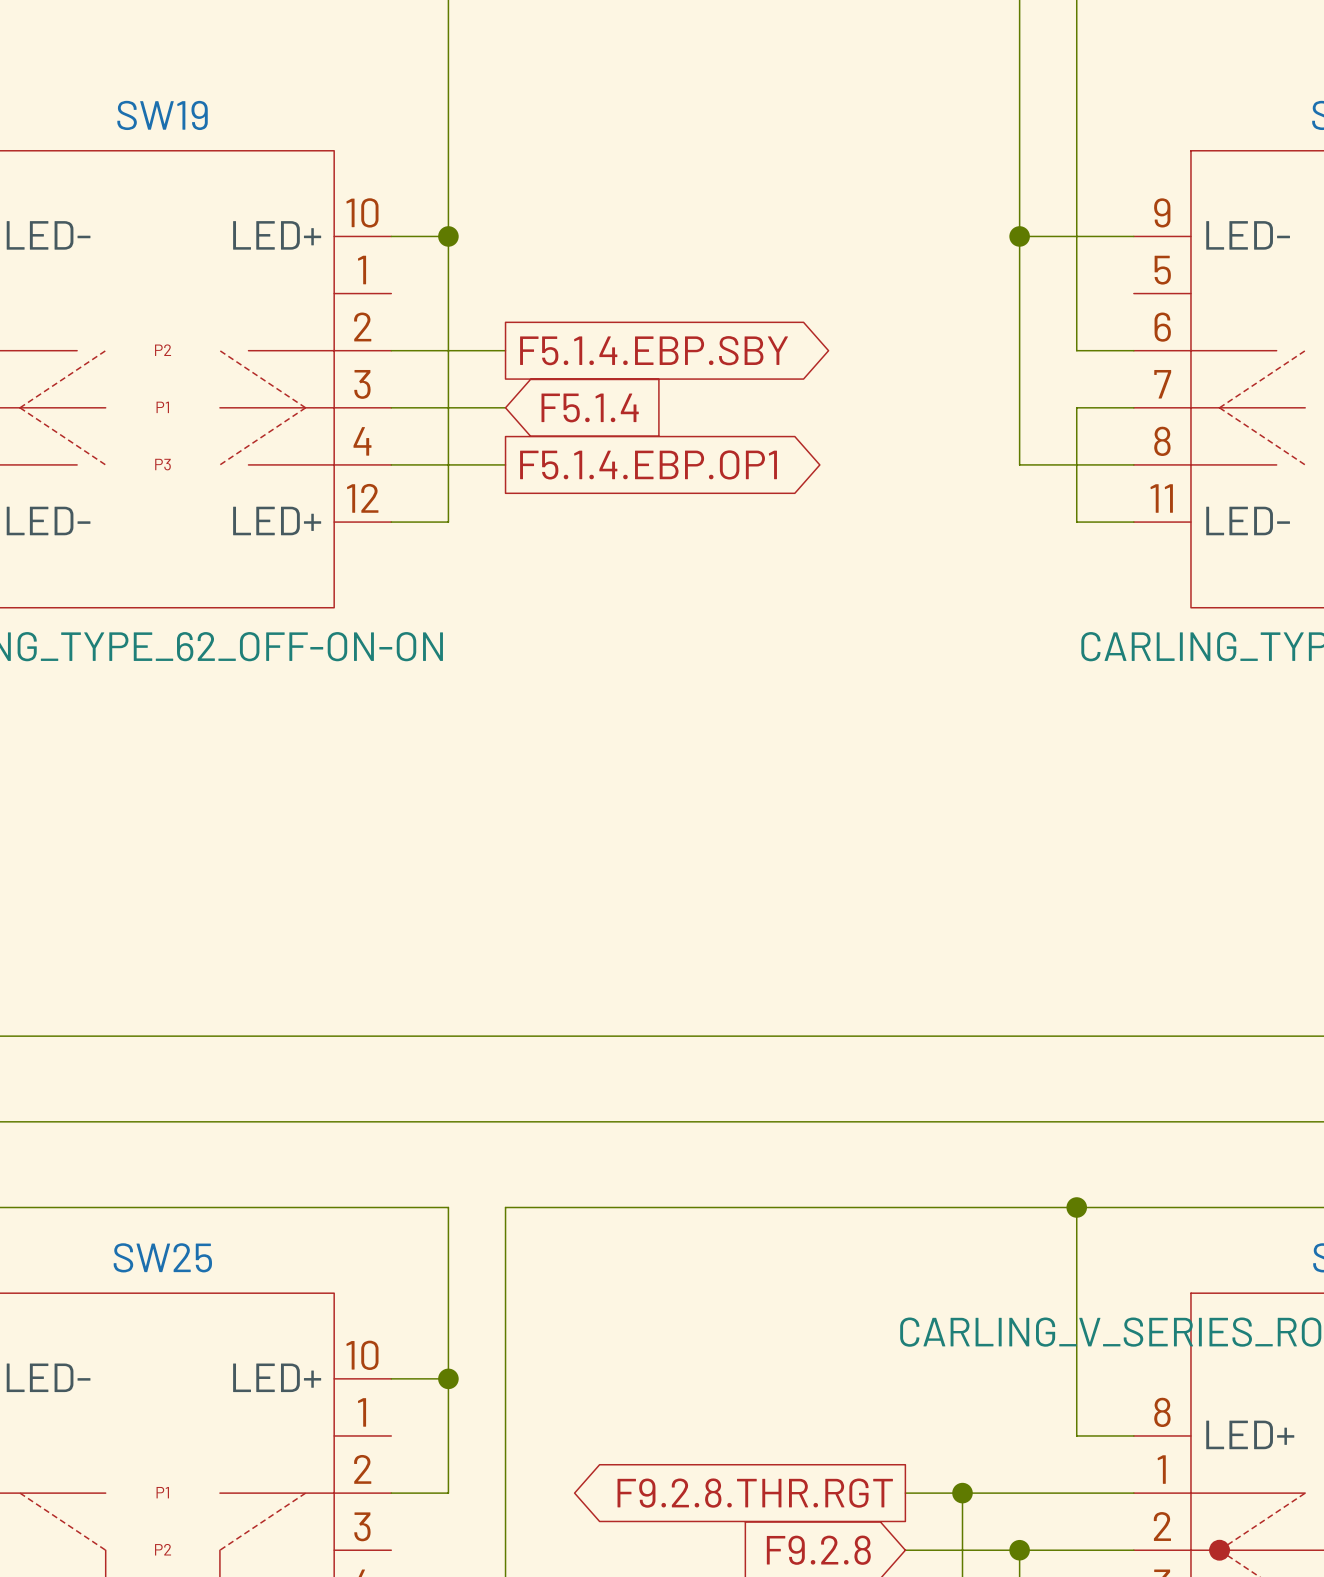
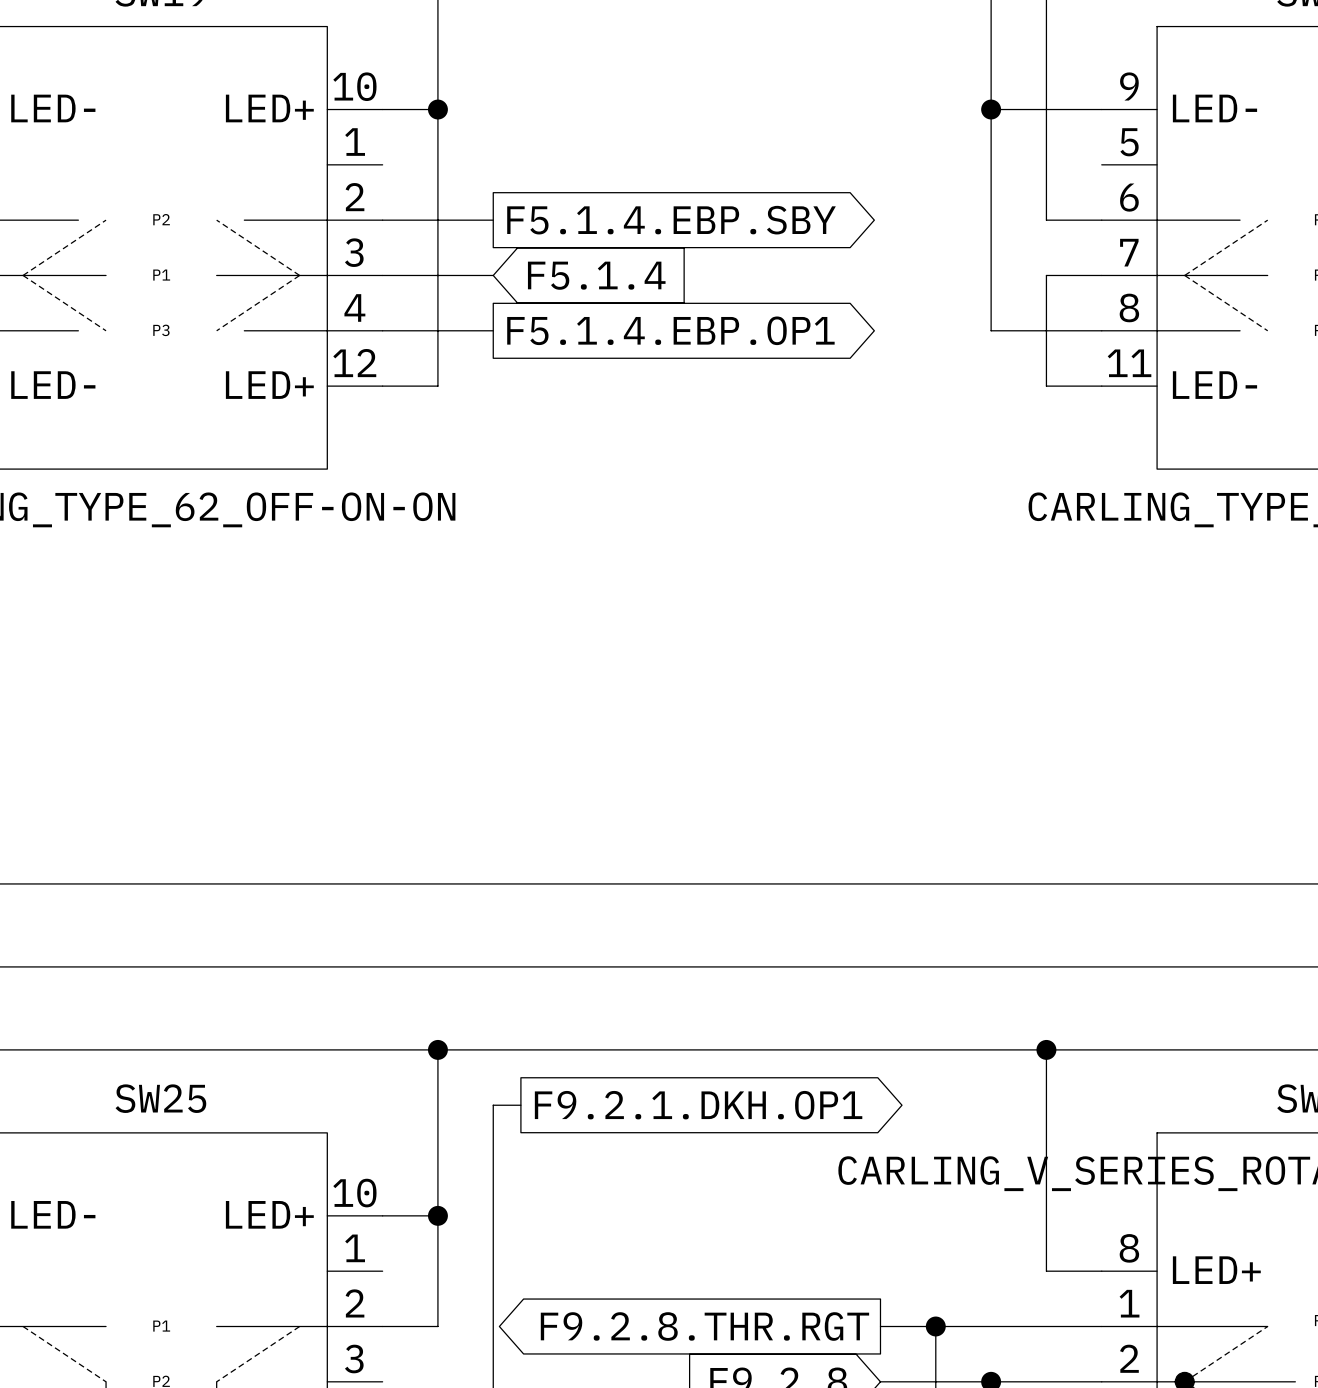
wire: none -> (437, 1049) (493, 1049)
junction: none -> (437, 1049)
wire: (505, 1207) (505, 1264) -> (520, 1105) (493, 1105)
global label: none -> F9.2.1.DKH.OP1 (698, 1105)

